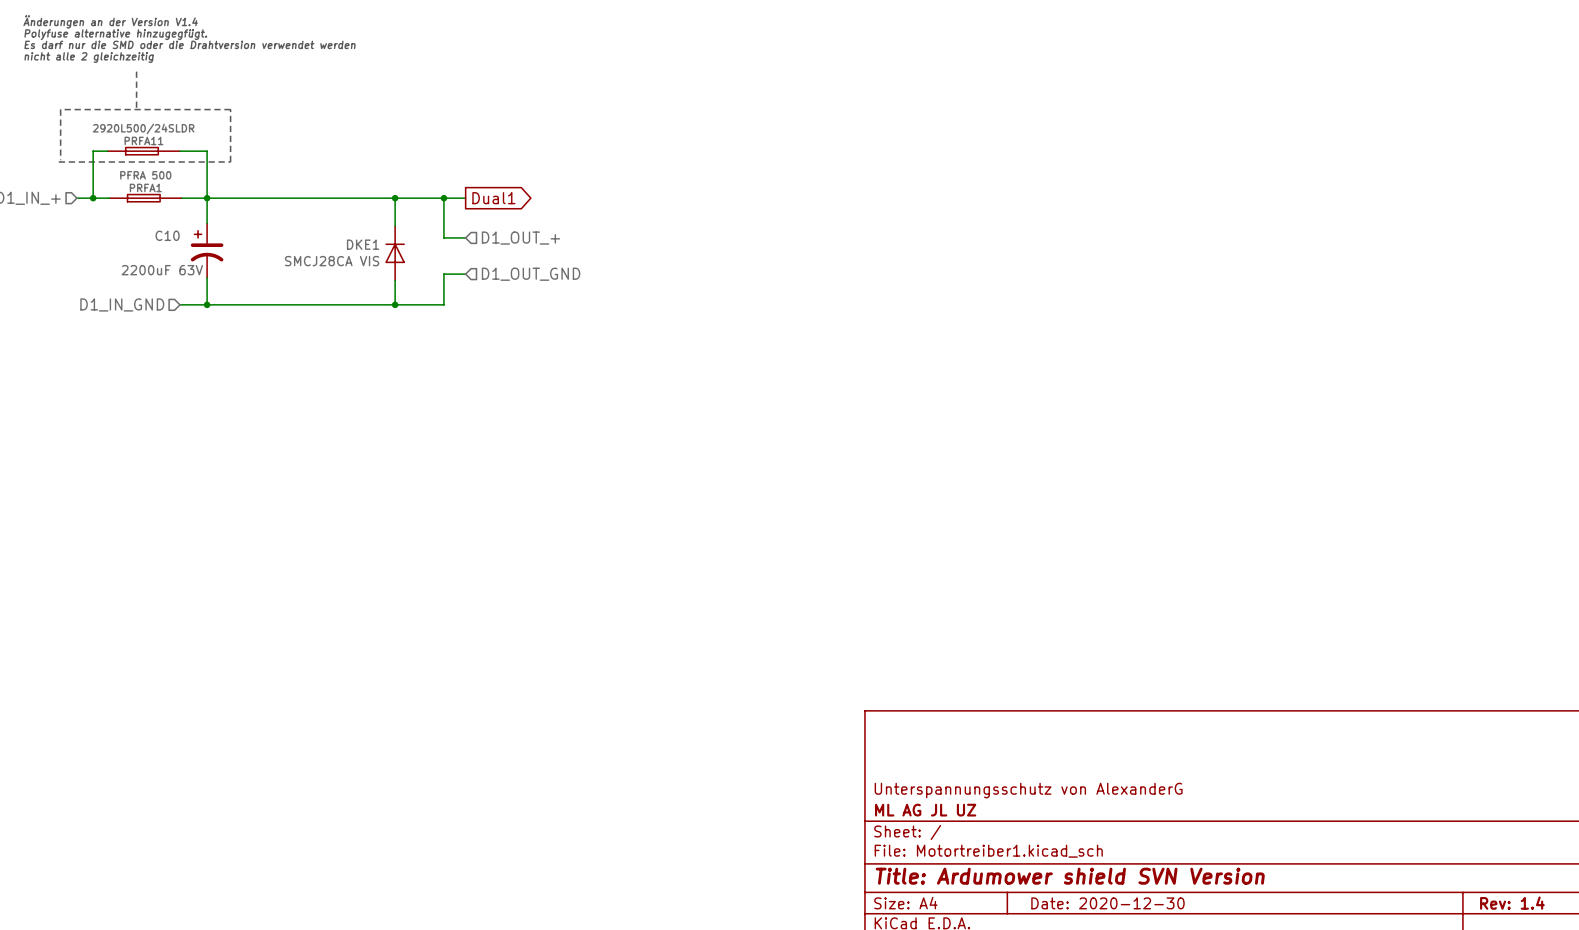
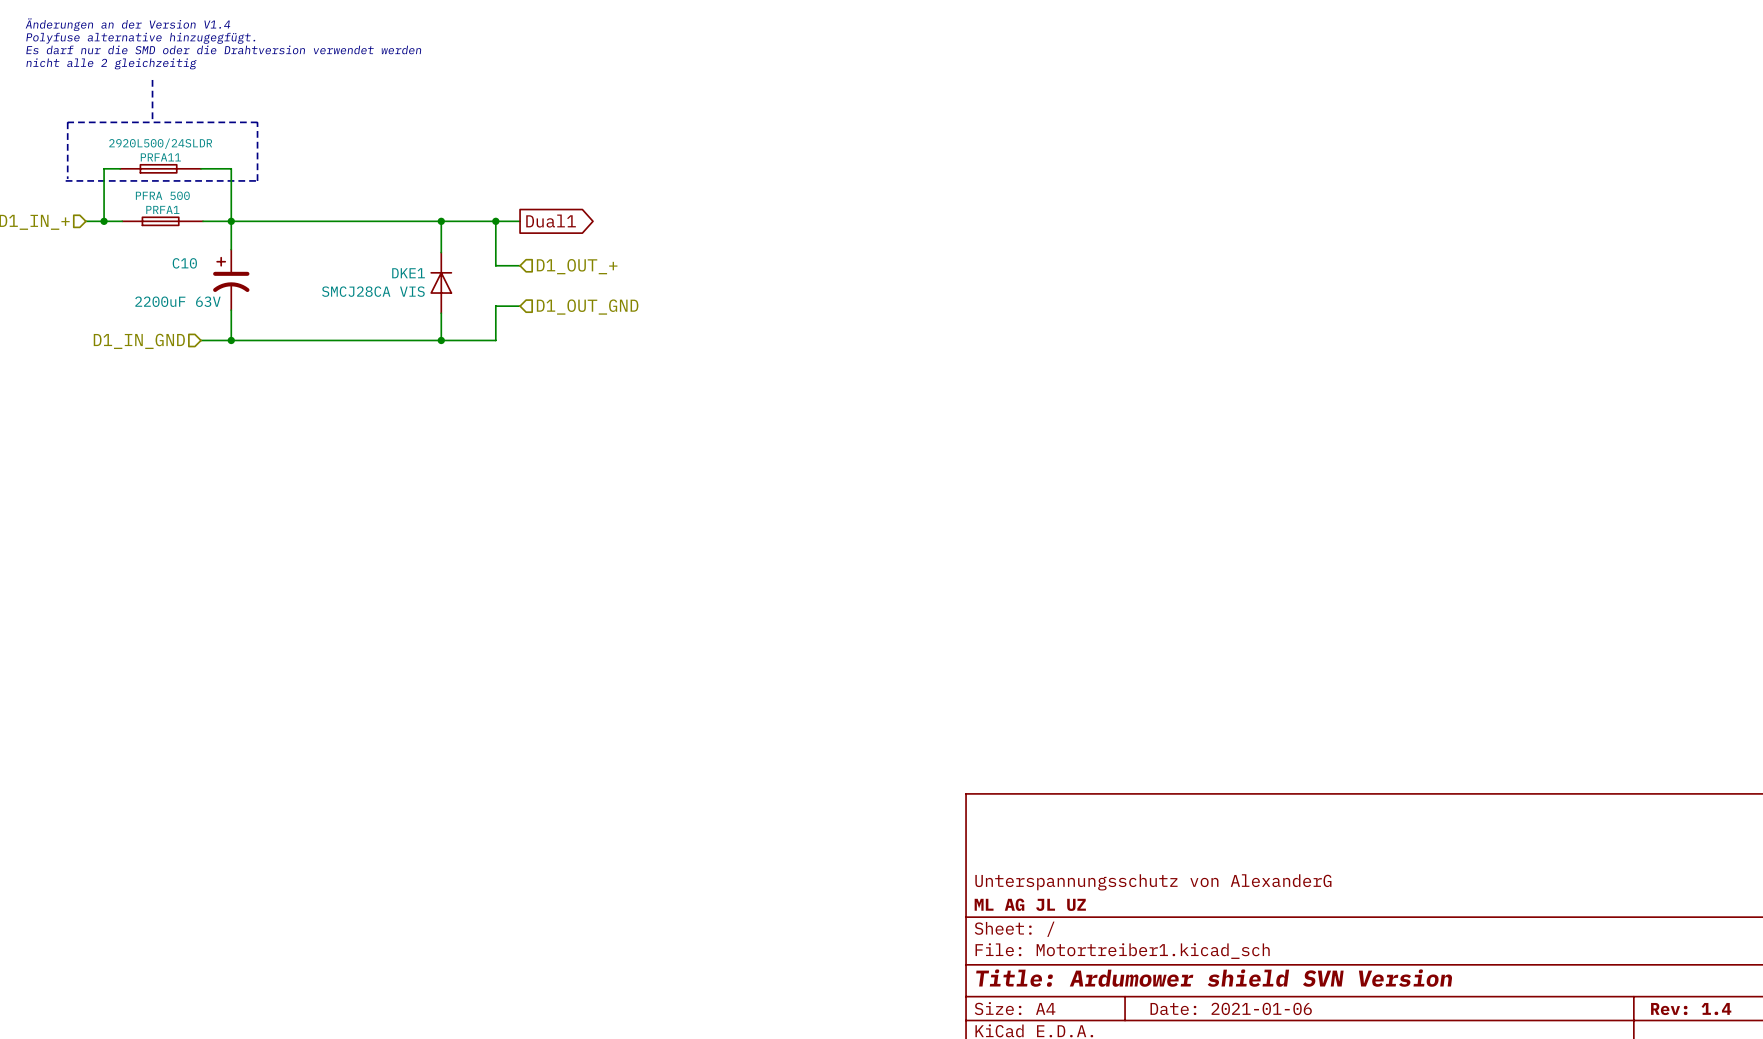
title block: Date: 2020-12-30 (1107, 903) -> Date: 2021-01-06 (1231, 1008)

